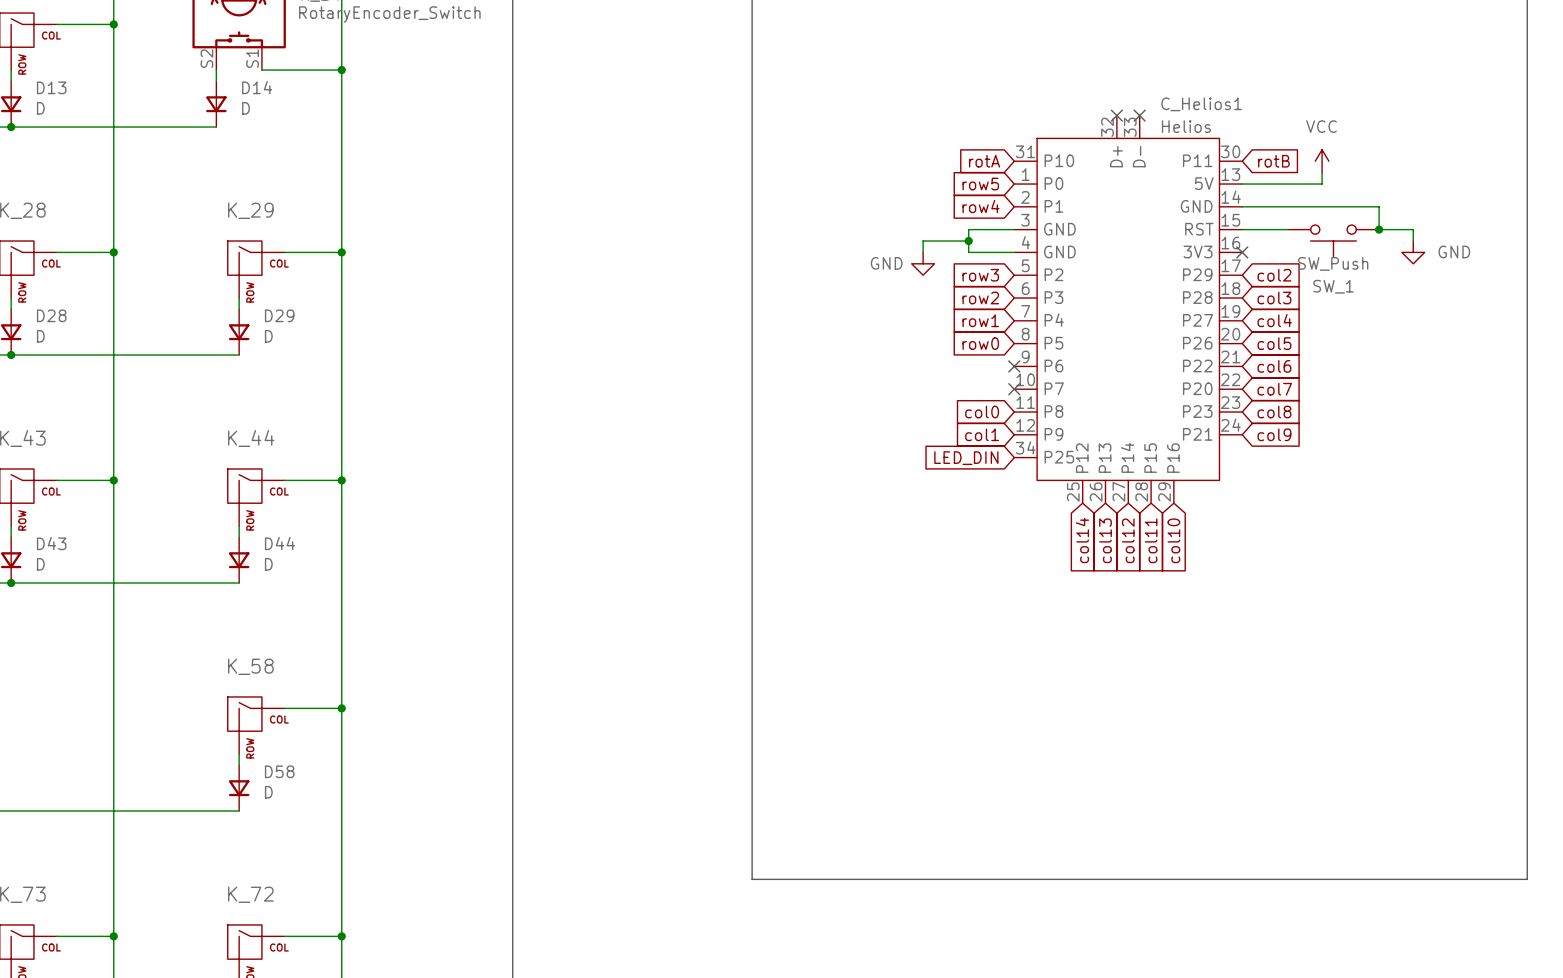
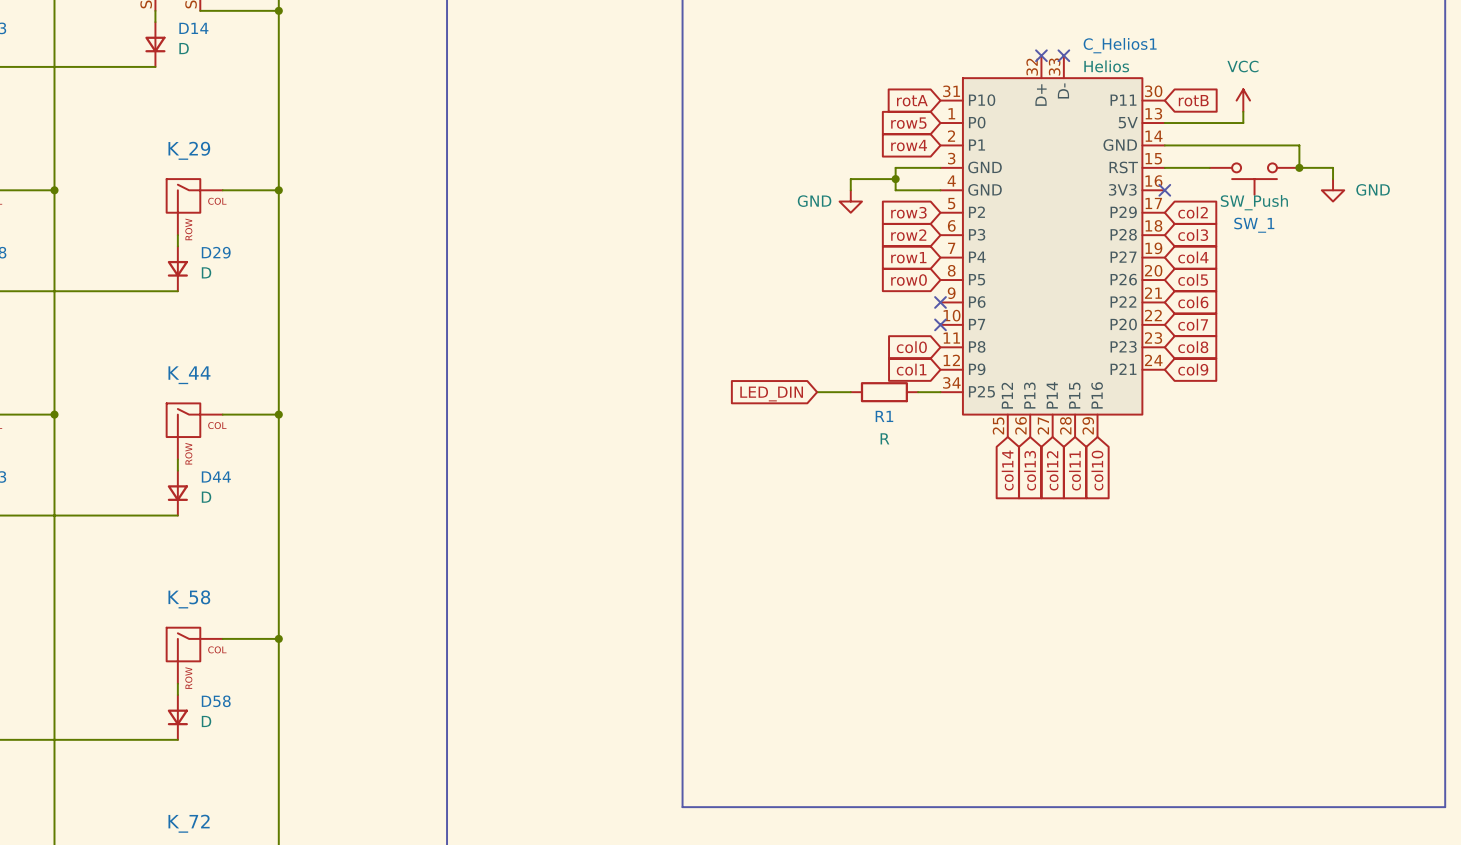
wire: none -> (817, 392) (850, 392)
R1: none -> R (884, 392)
wire: none -> (918, 392) (940, 392)
global label position: LED_DIN (966, 458) -> LED_DIN (771, 393)

